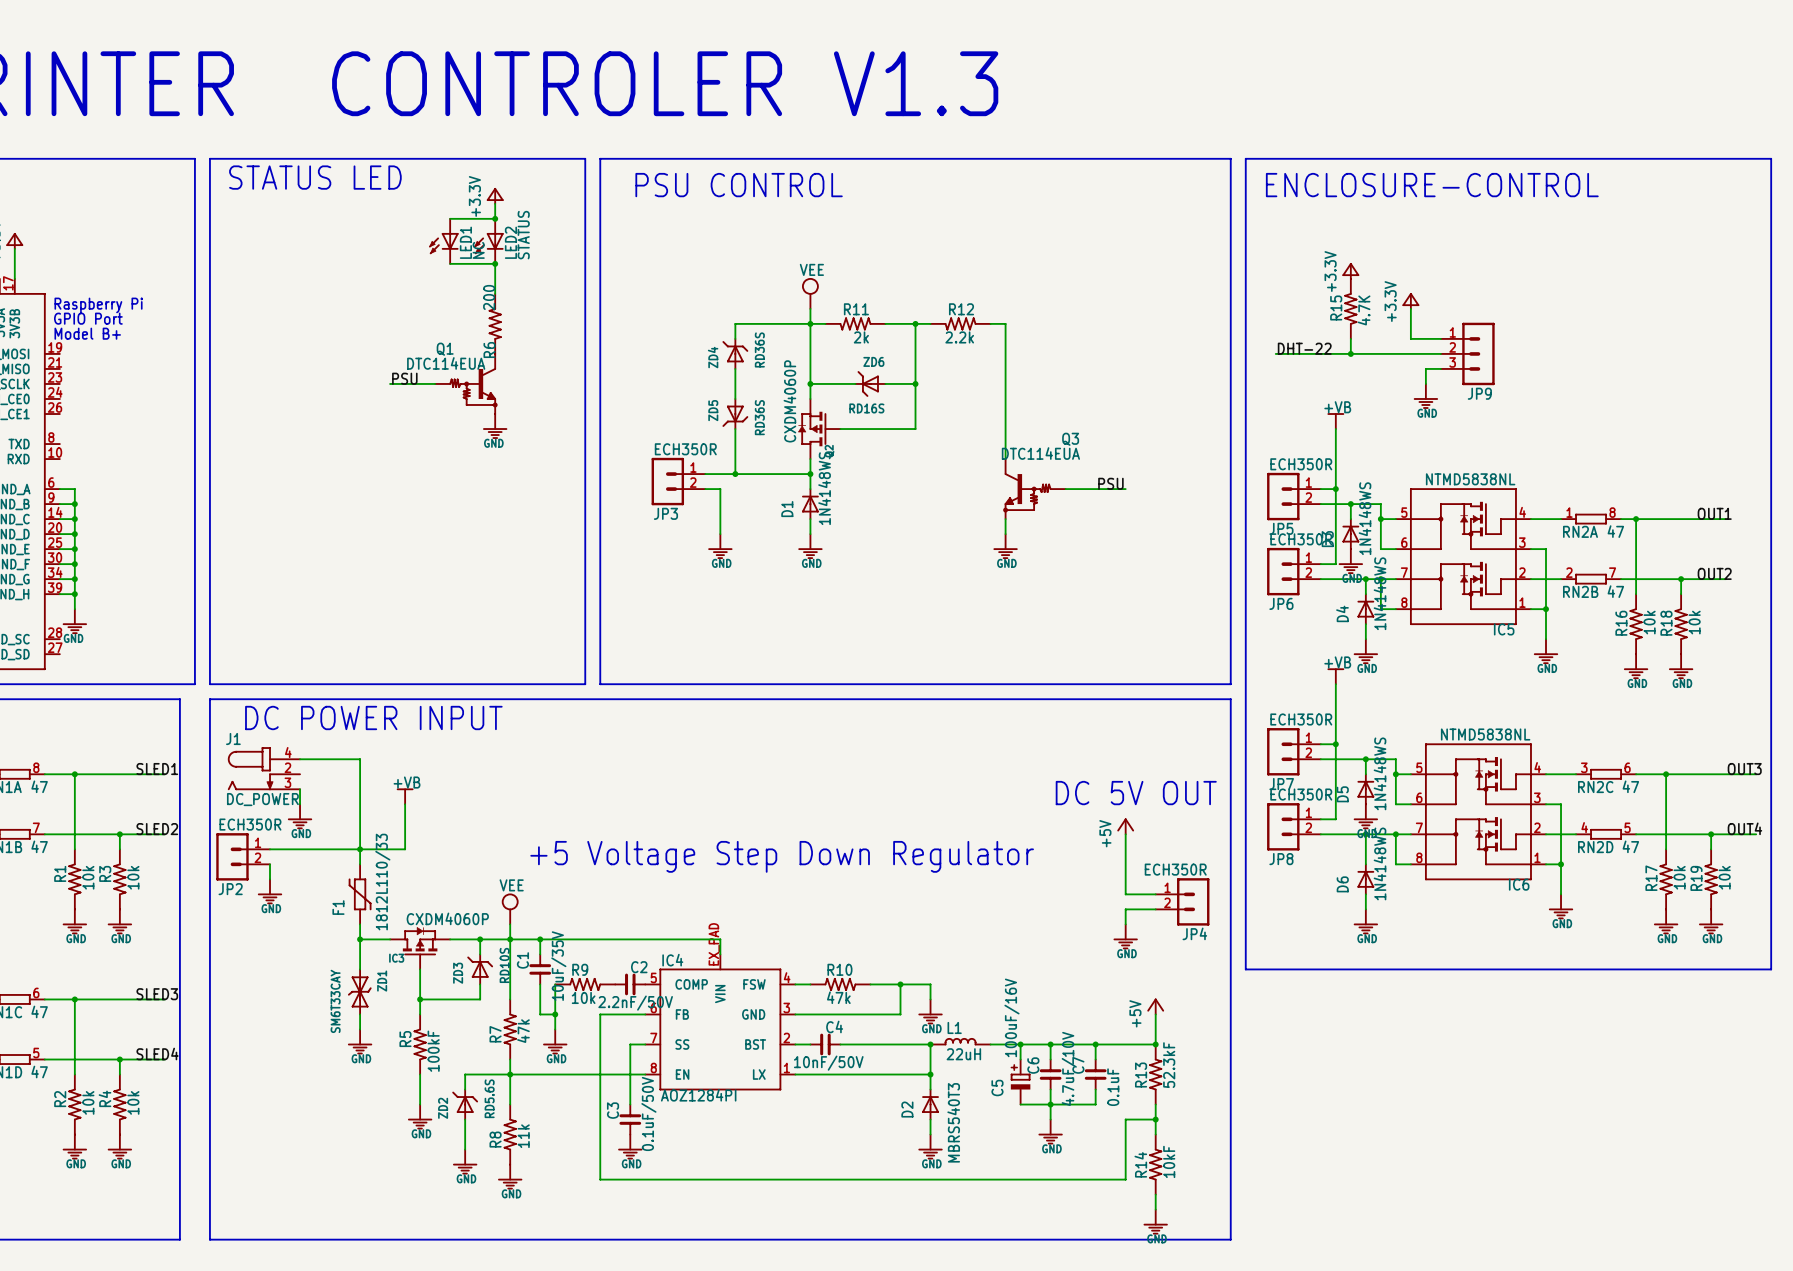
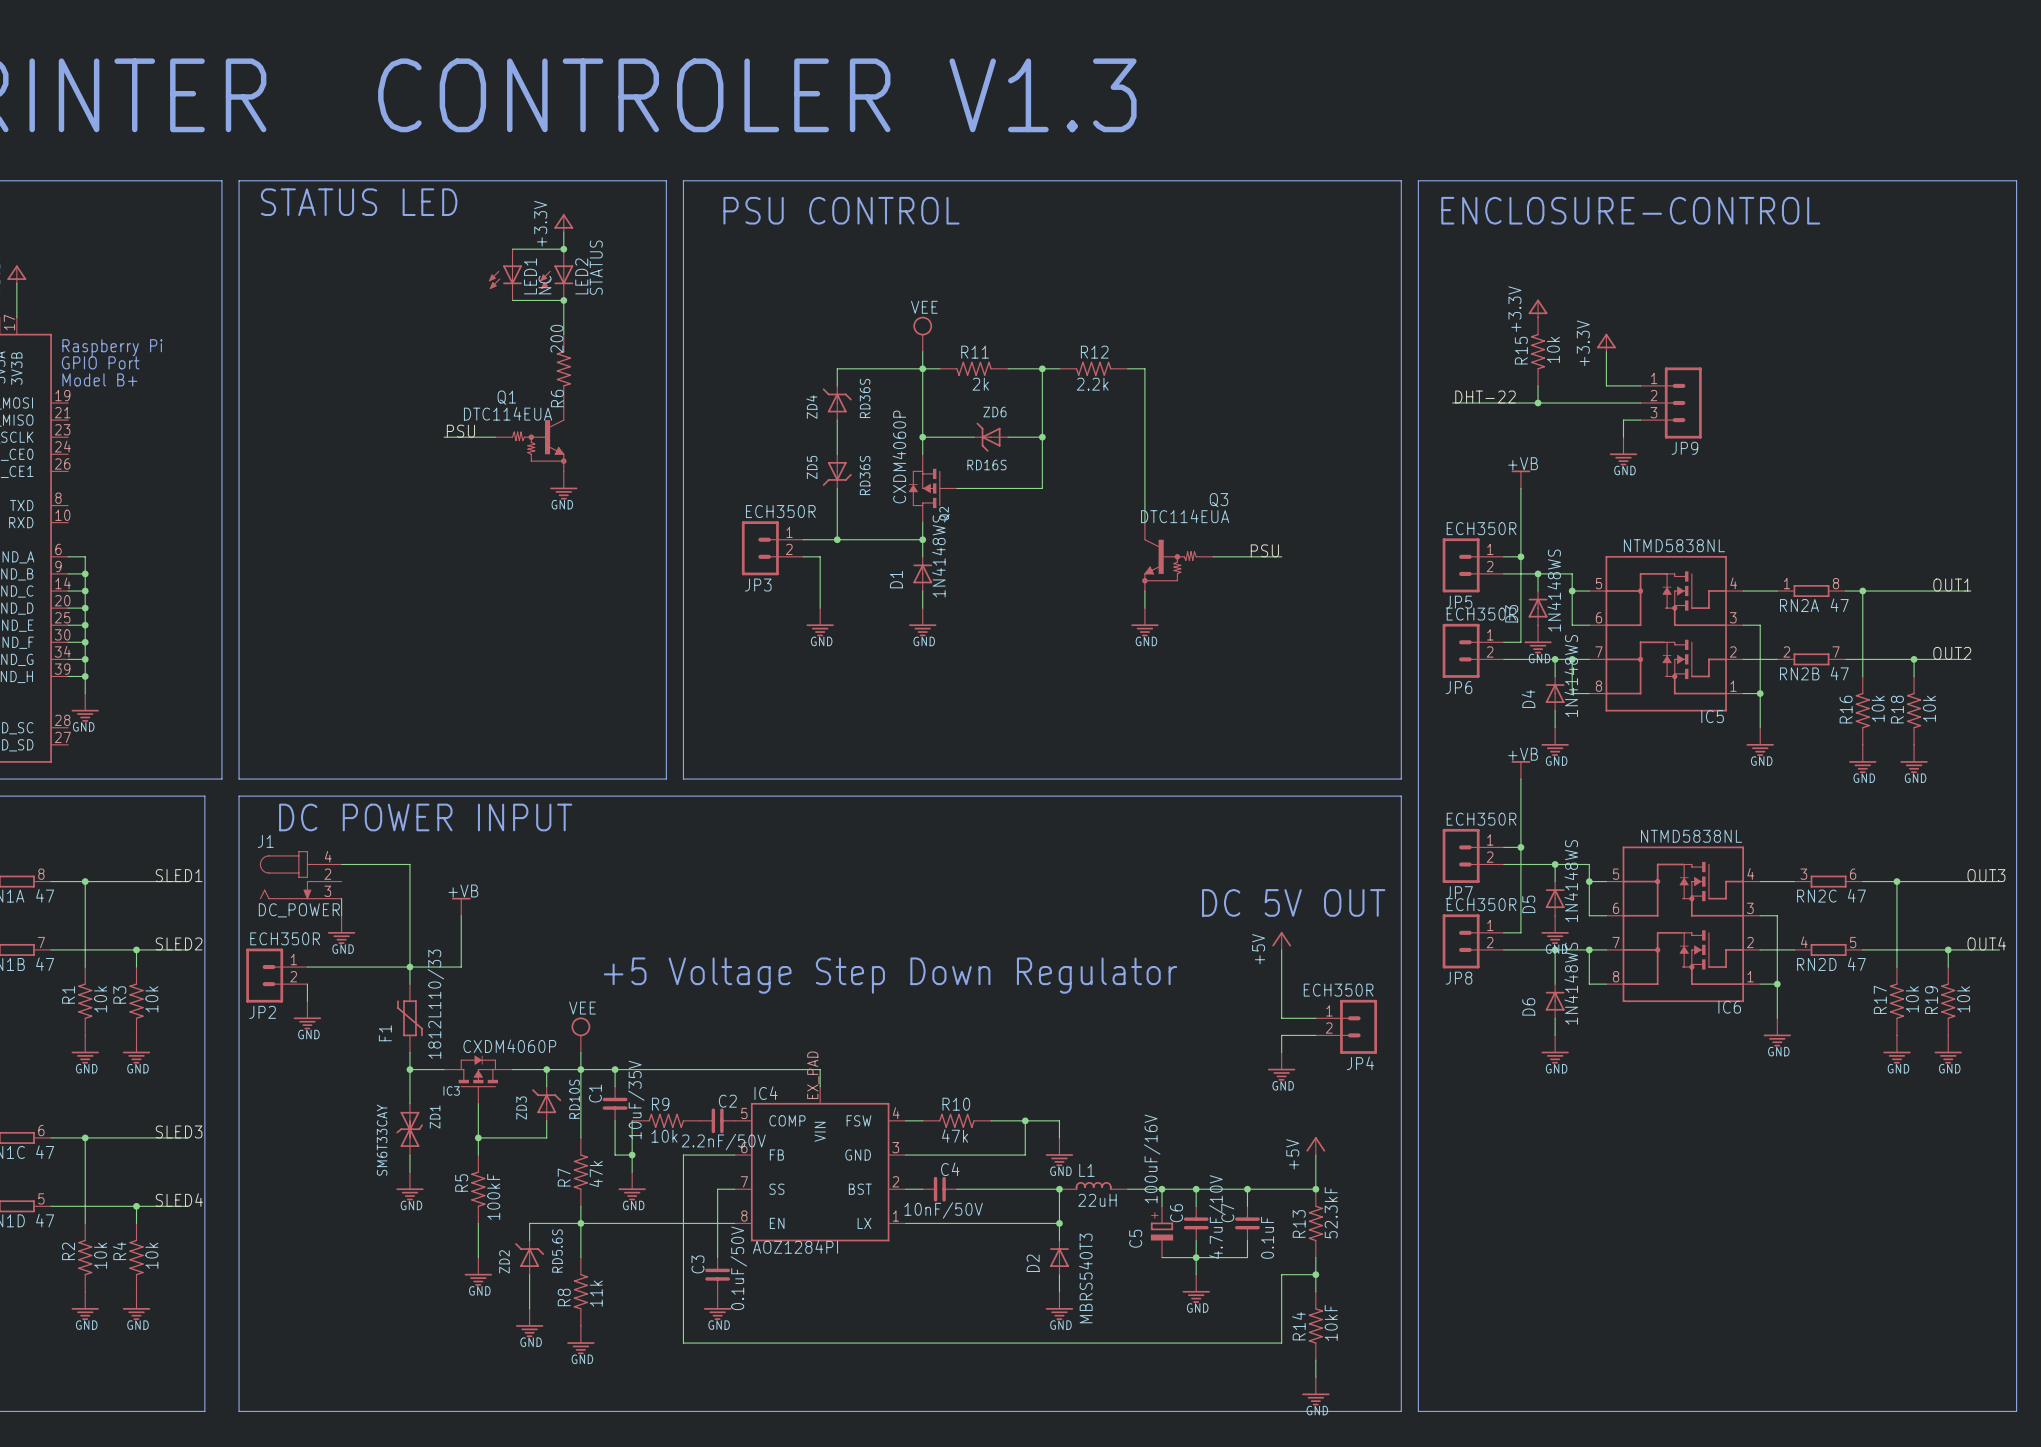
R15 value: 4.7K (1364, 310) -> 10k (1553, 349)
line: (1245, 969) (1771, 969) -> (1418, 1103) (1418, 1411) (2016, 1411) (2016, 1103)

